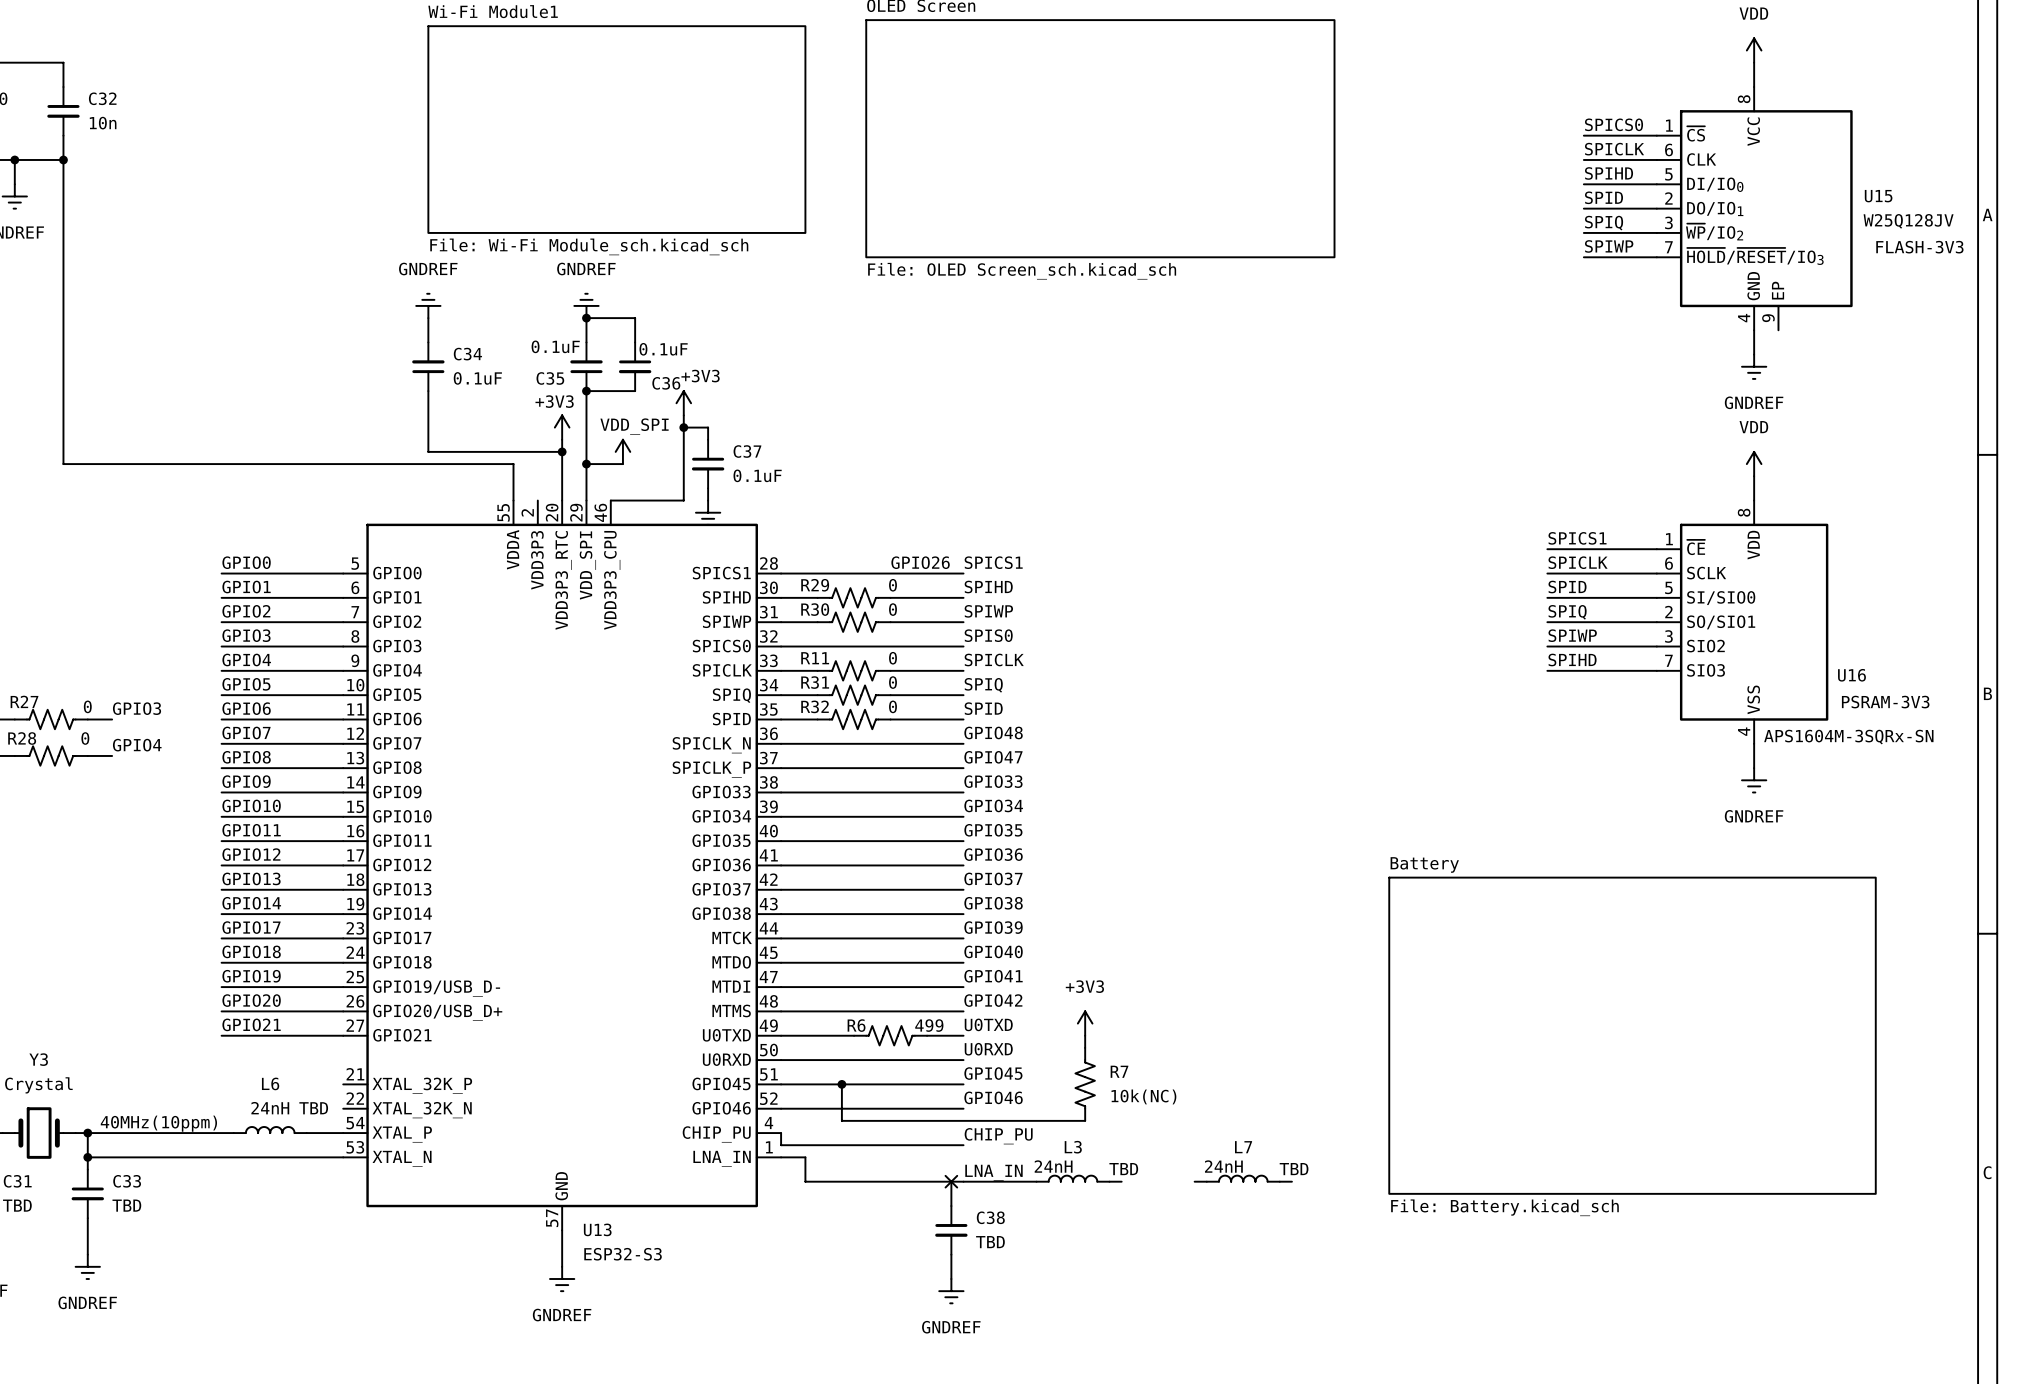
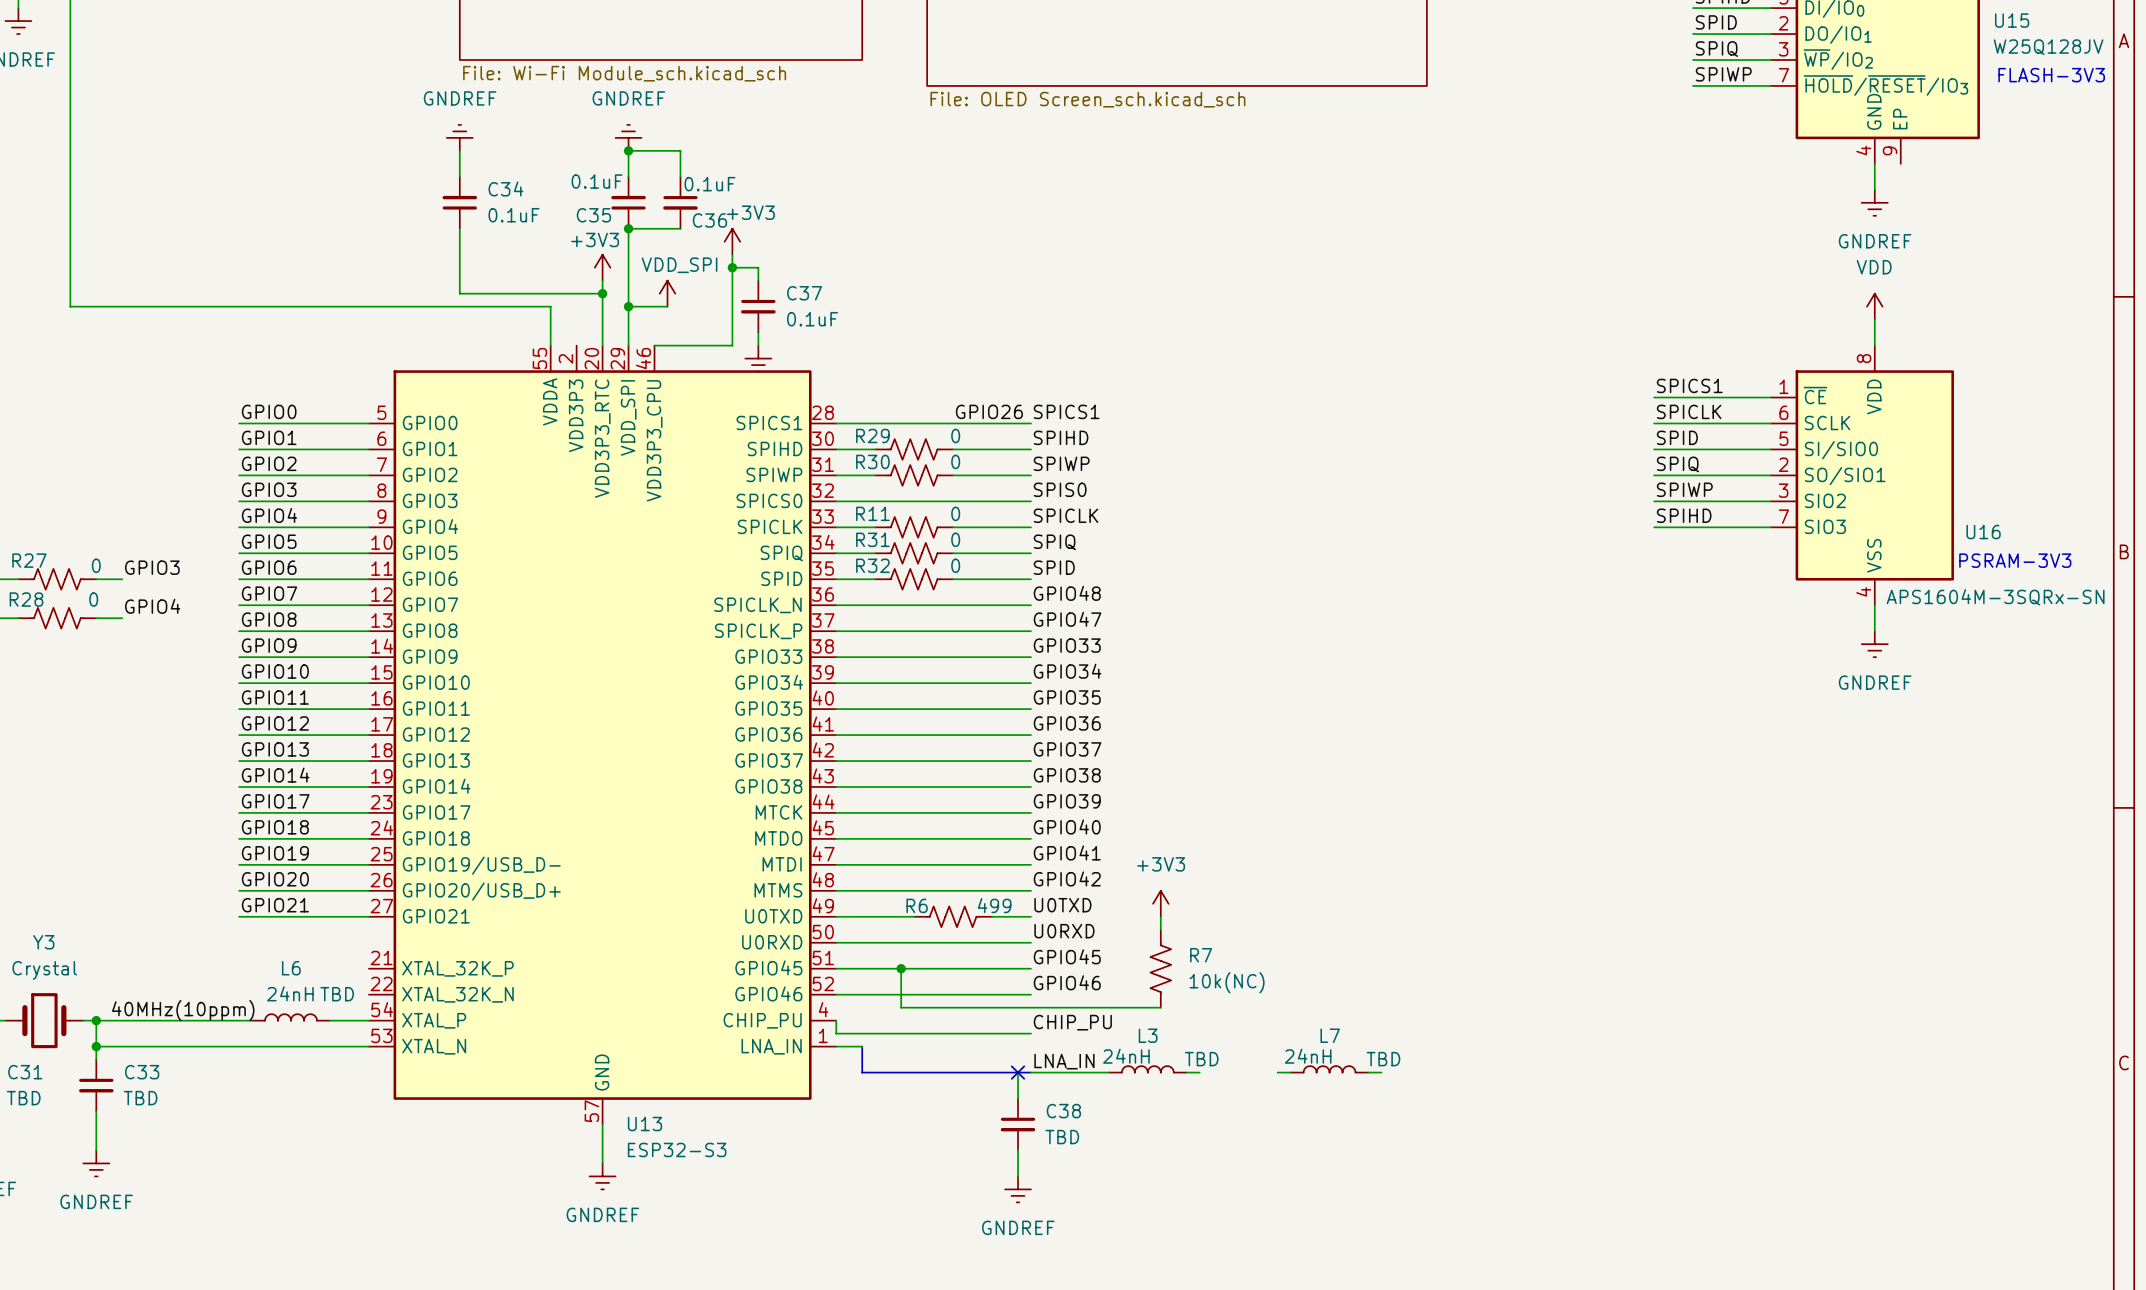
sheet Battery: File: Battery.kicad_sch (1632, 1035) -> none

